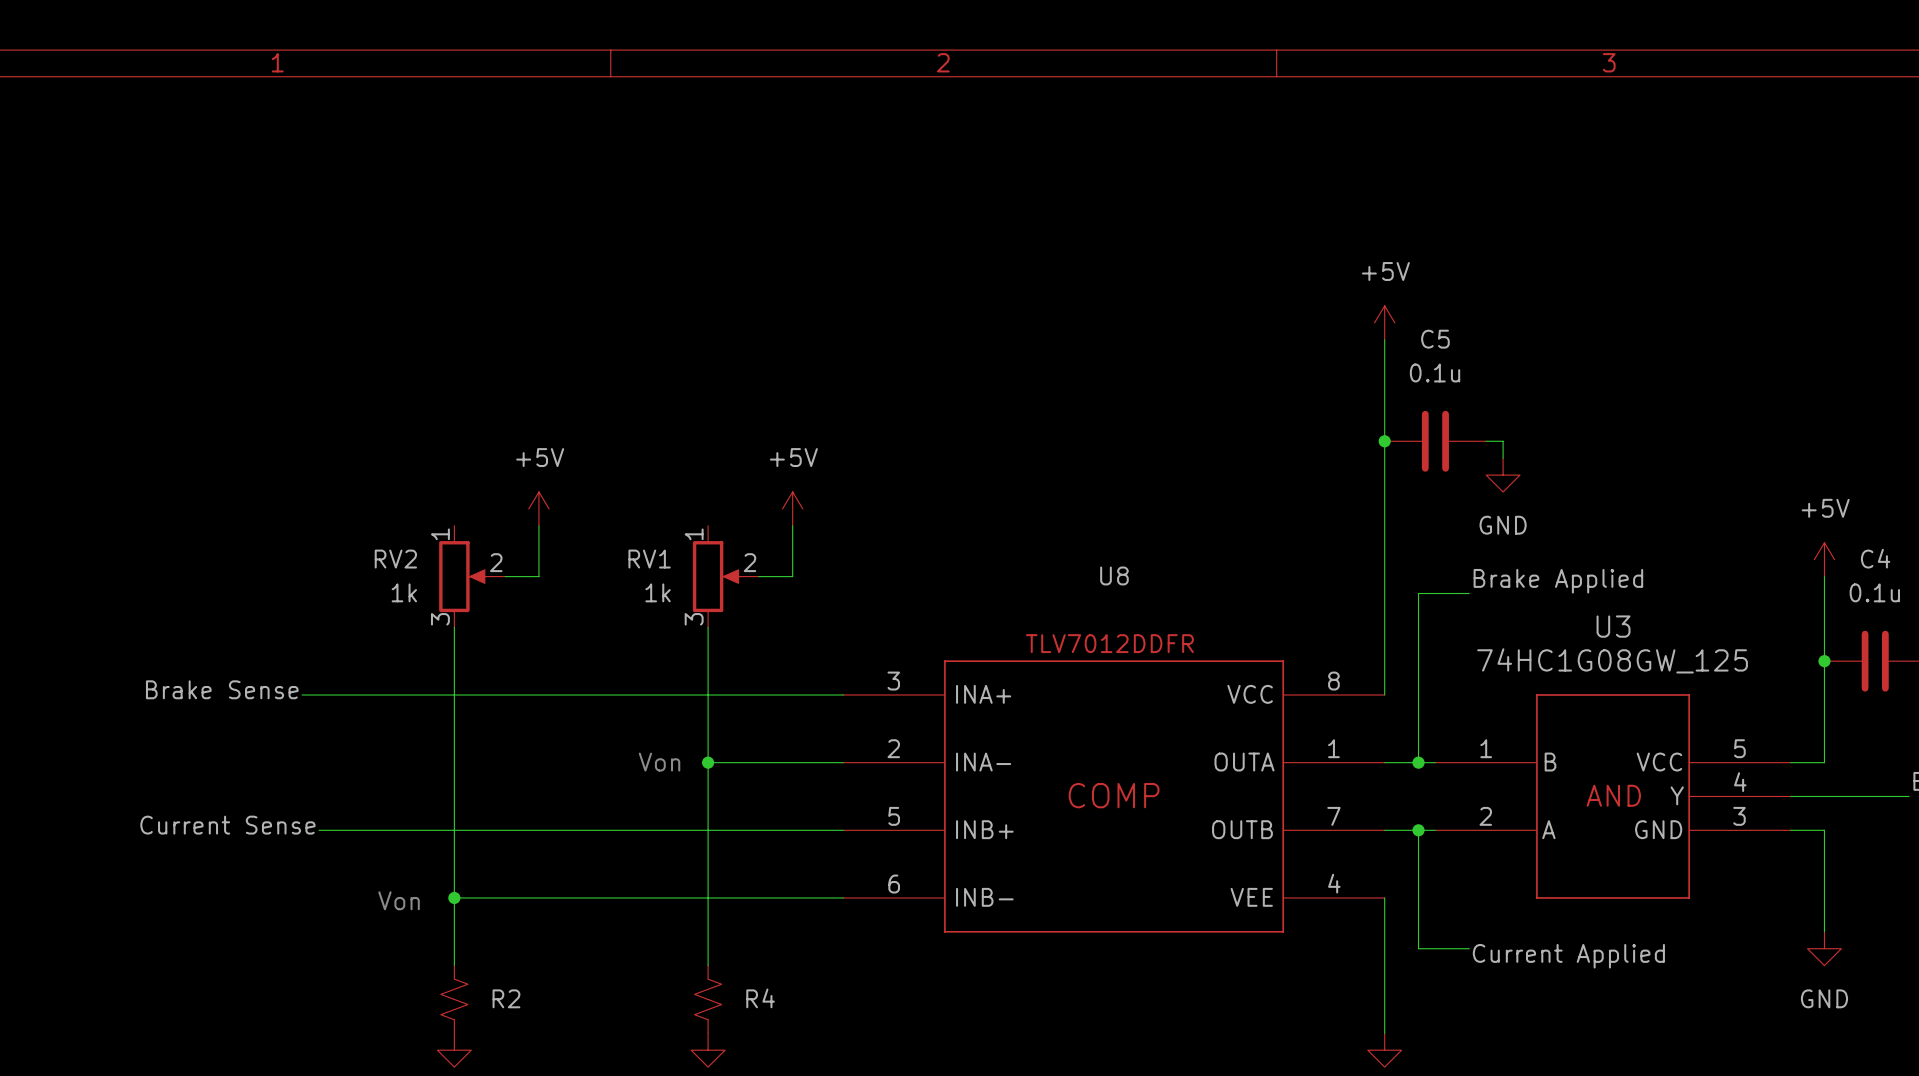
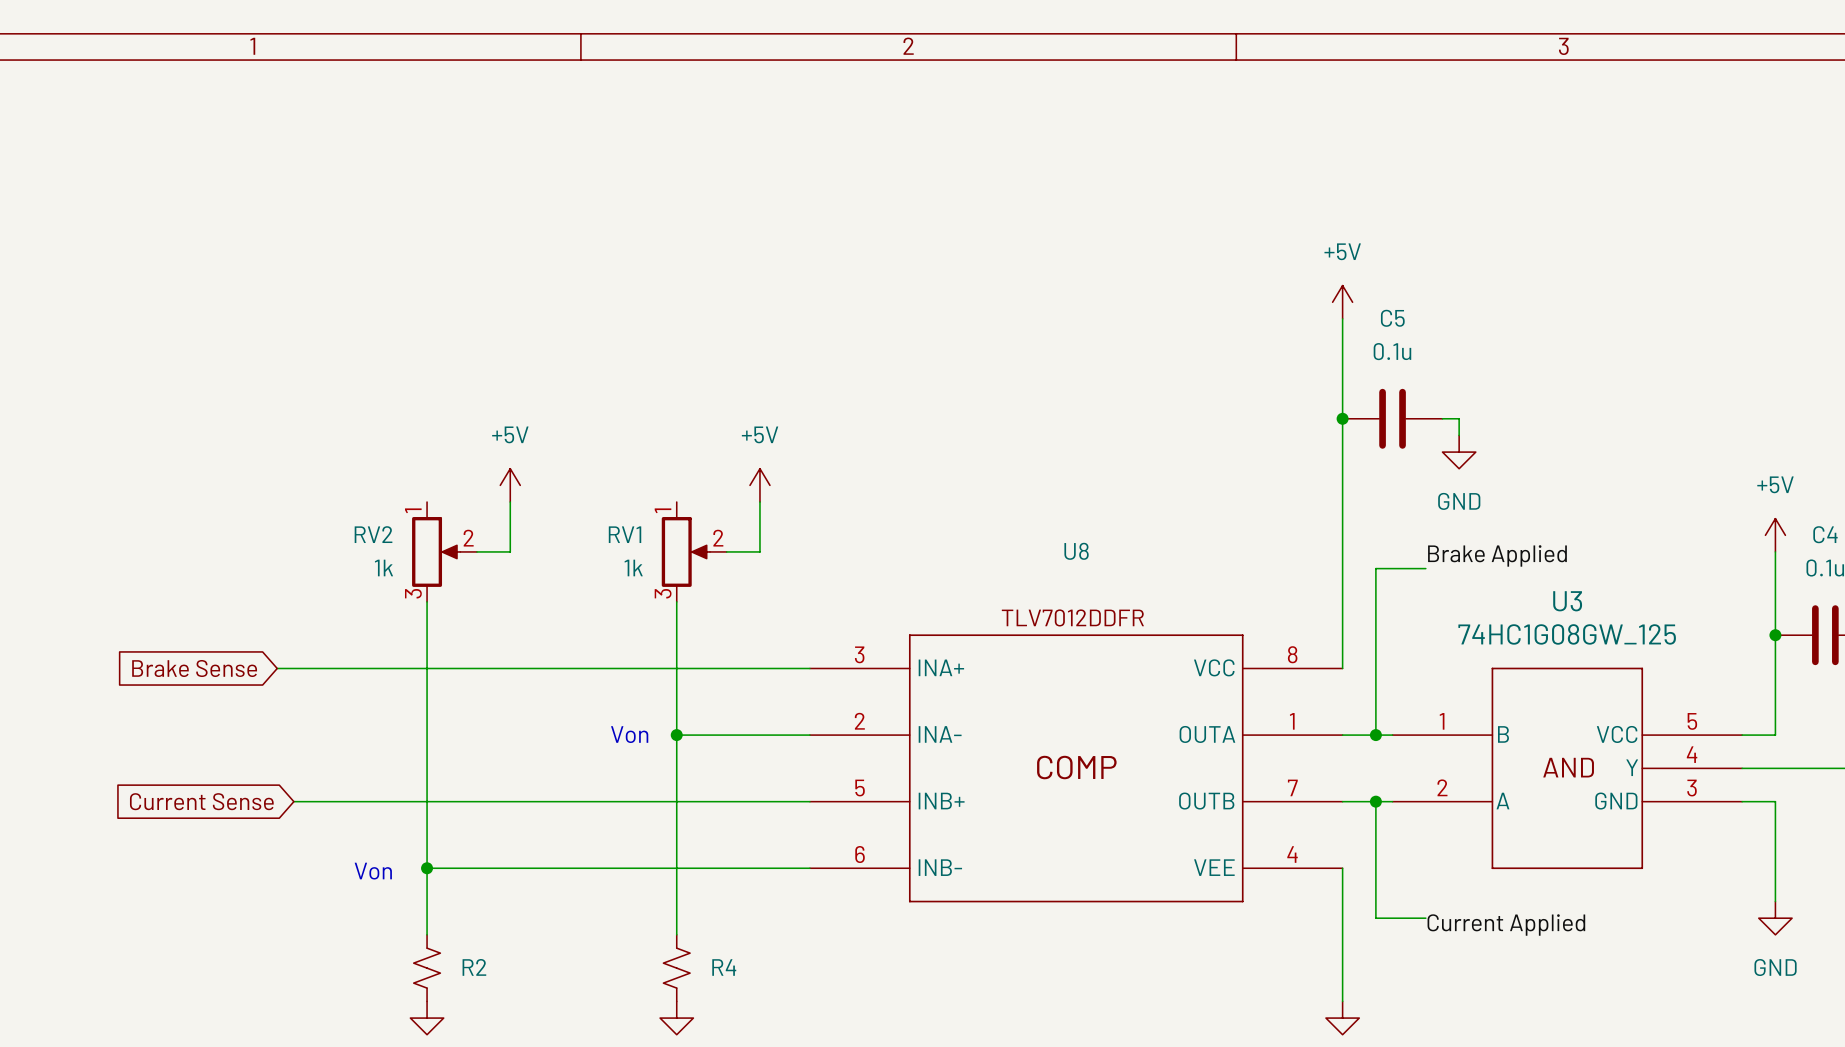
label: Brake Sense (222, 689) -> none
global label: none -> Brake Sense (194, 668)
label: Current Sense (227, 825) -> none
global label: none -> Current Sense (201, 801)

